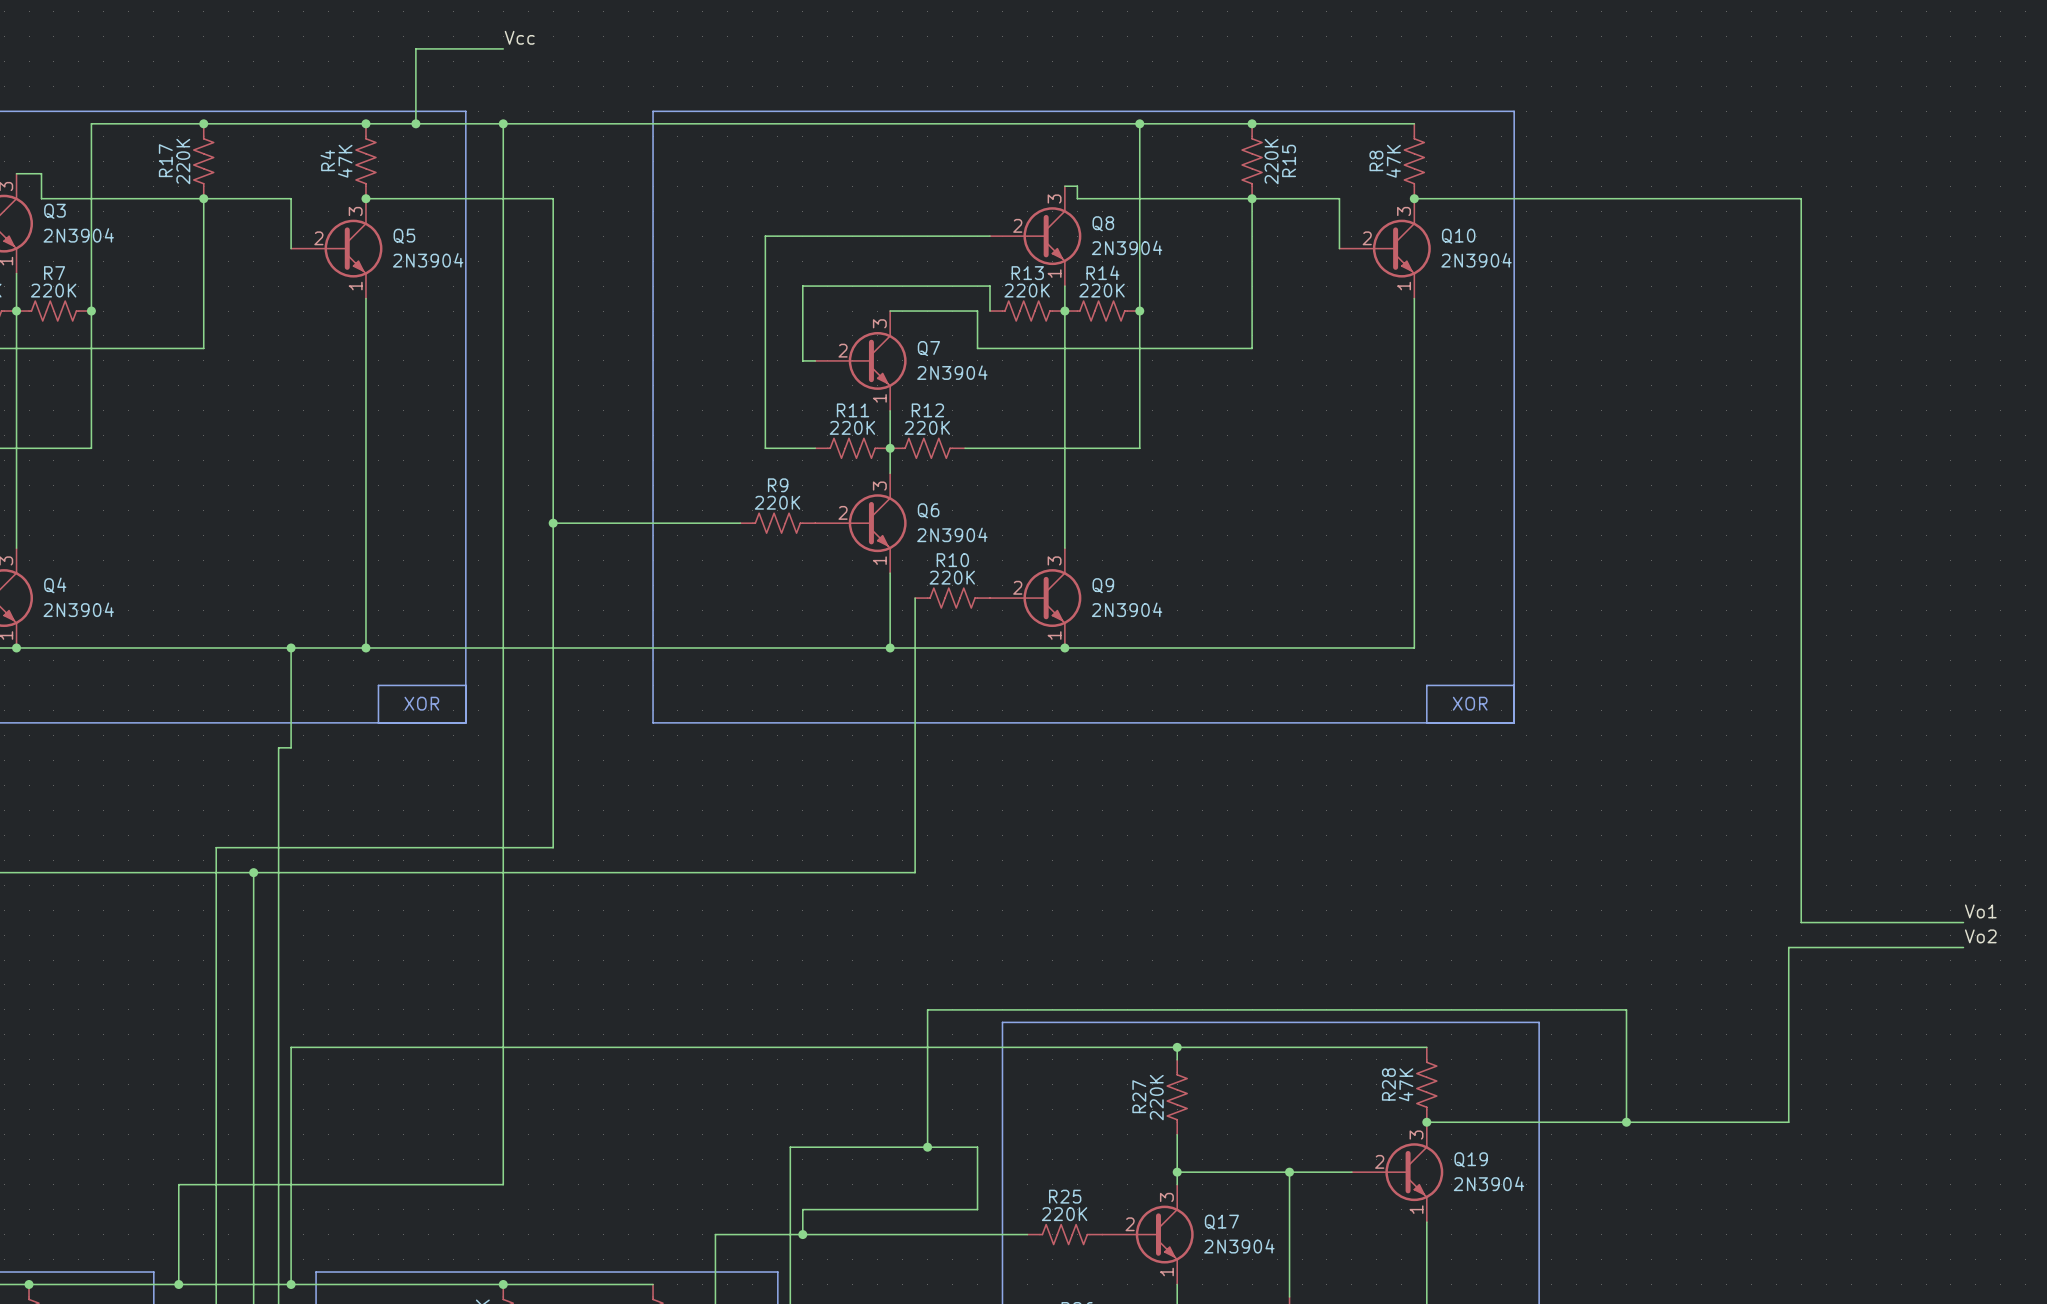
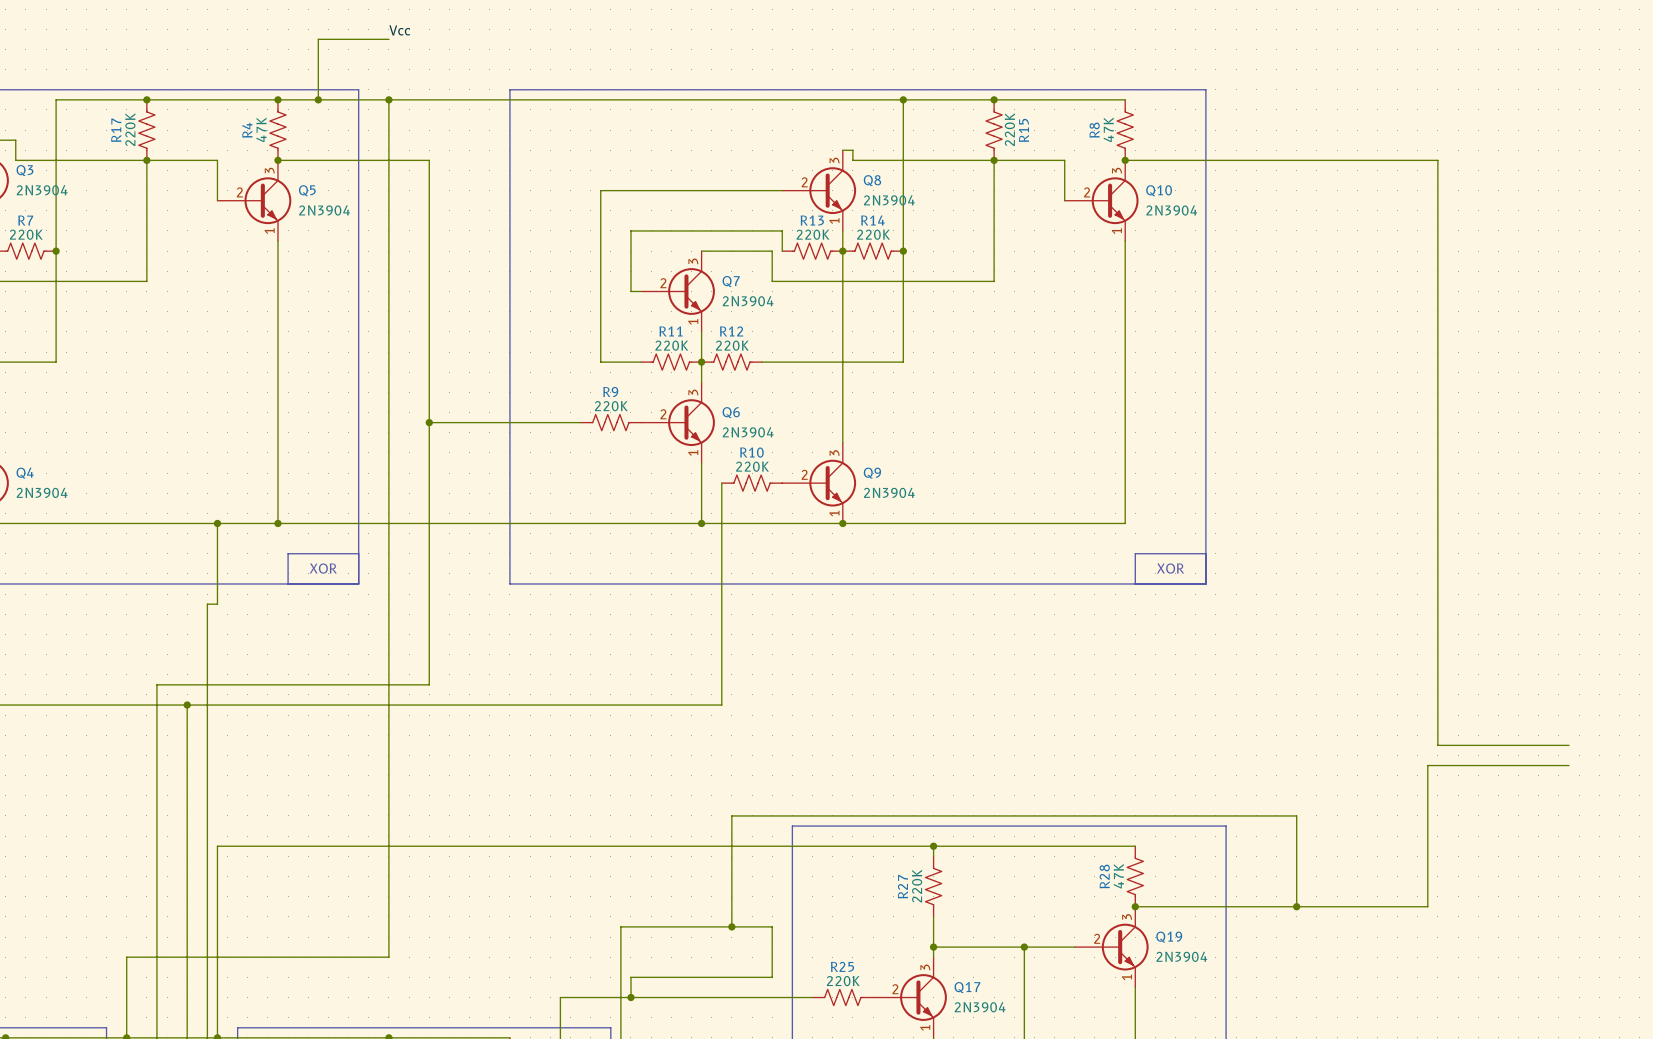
label: Vo1 (1980, 911) -> none
label: Vo2 (1980, 936) -> none

